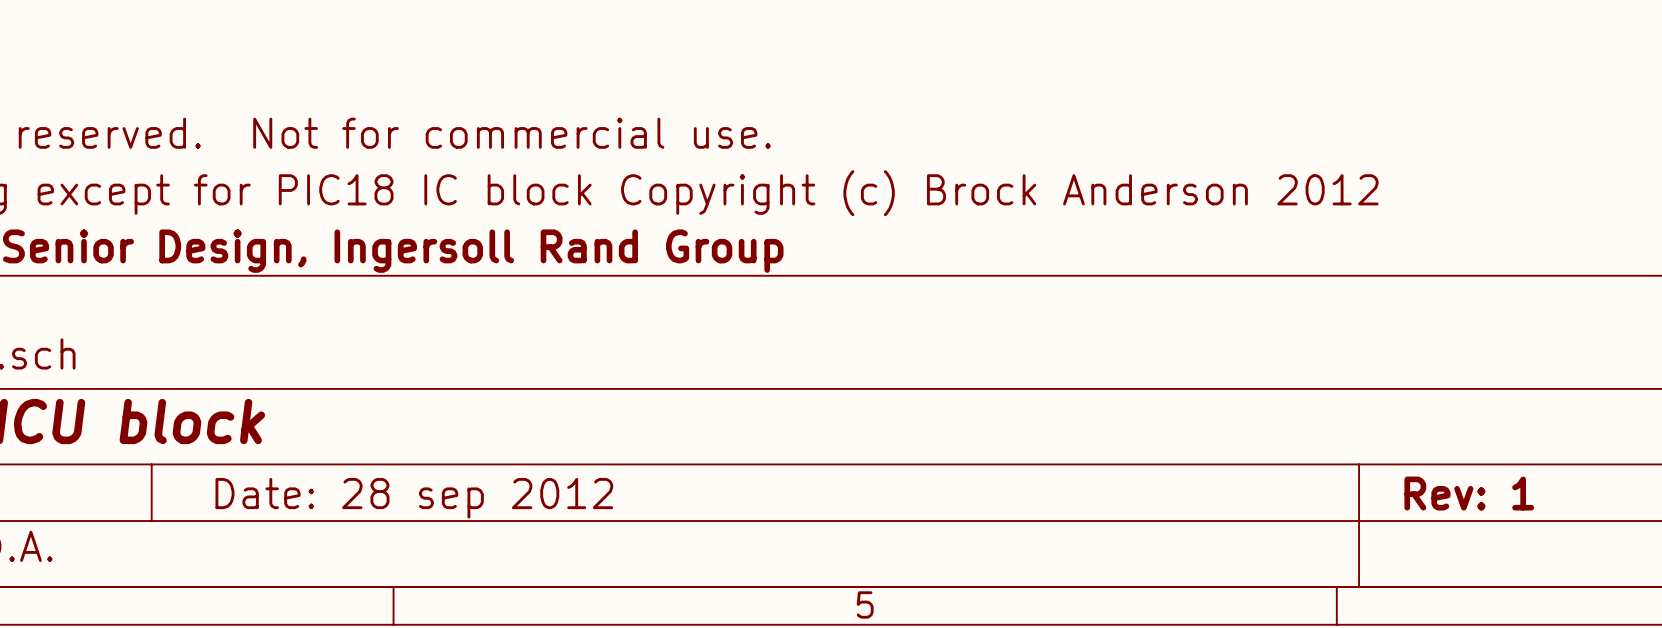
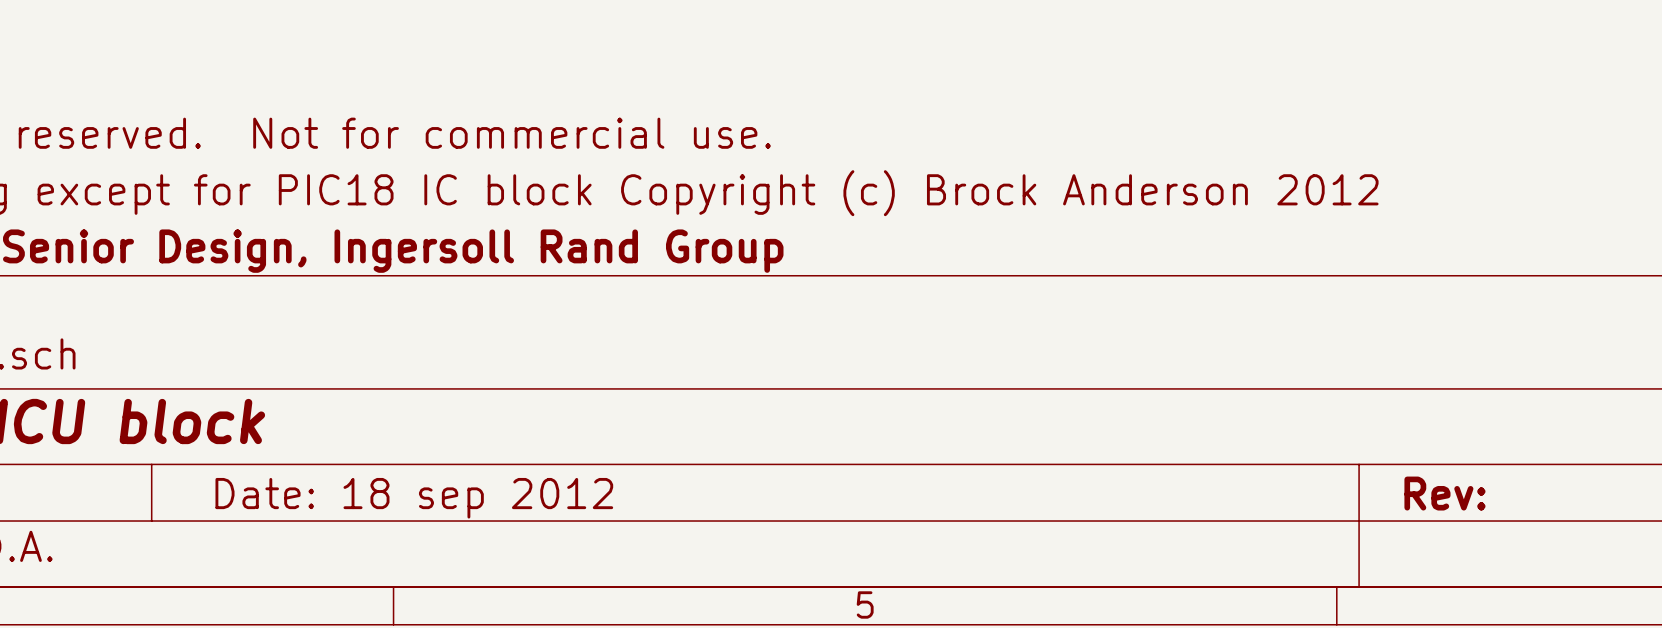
title block: Rev: 1 (1469, 493) -> Rev: (1444, 493)
title block: Date: 28 sep 2012 (414, 498) -> Date: 18 sep 2012 (414, 498)

